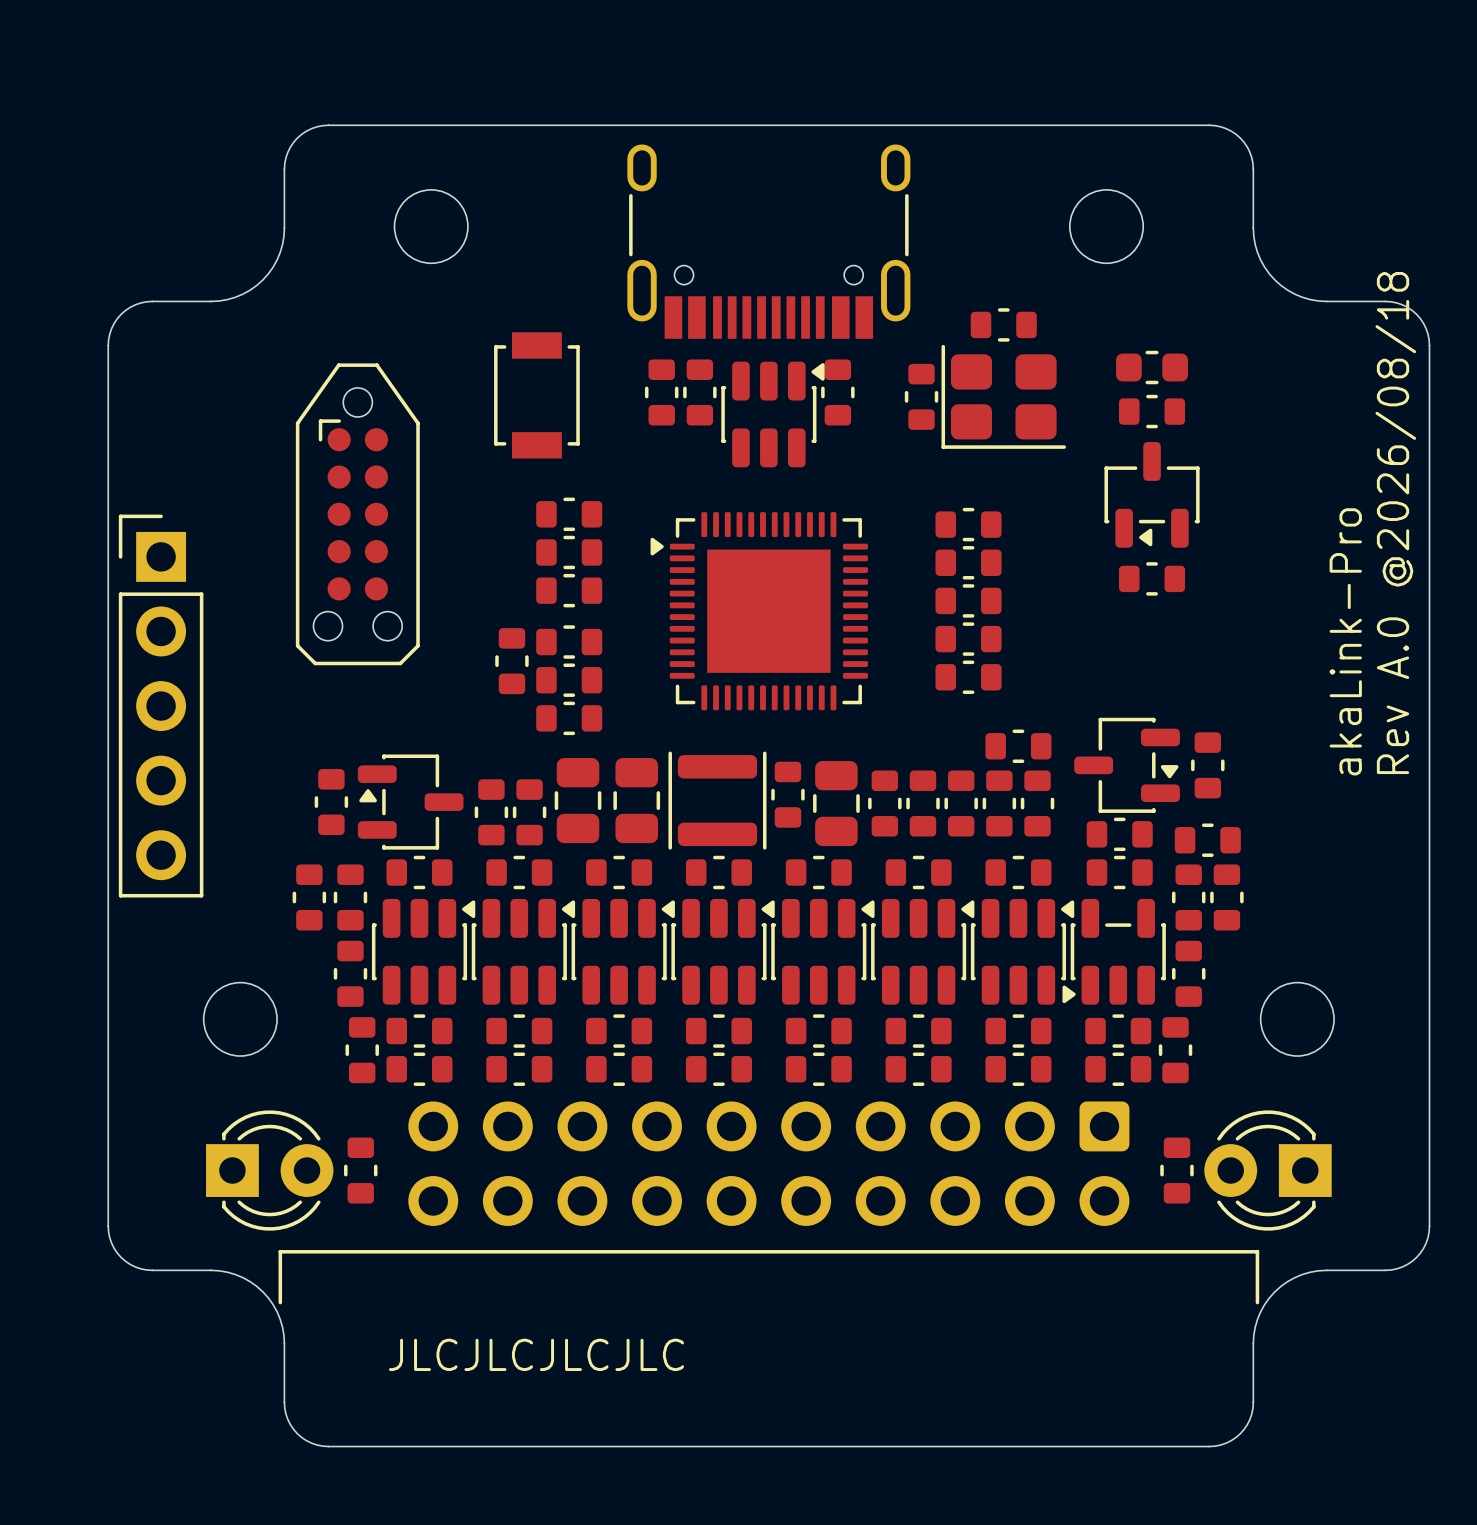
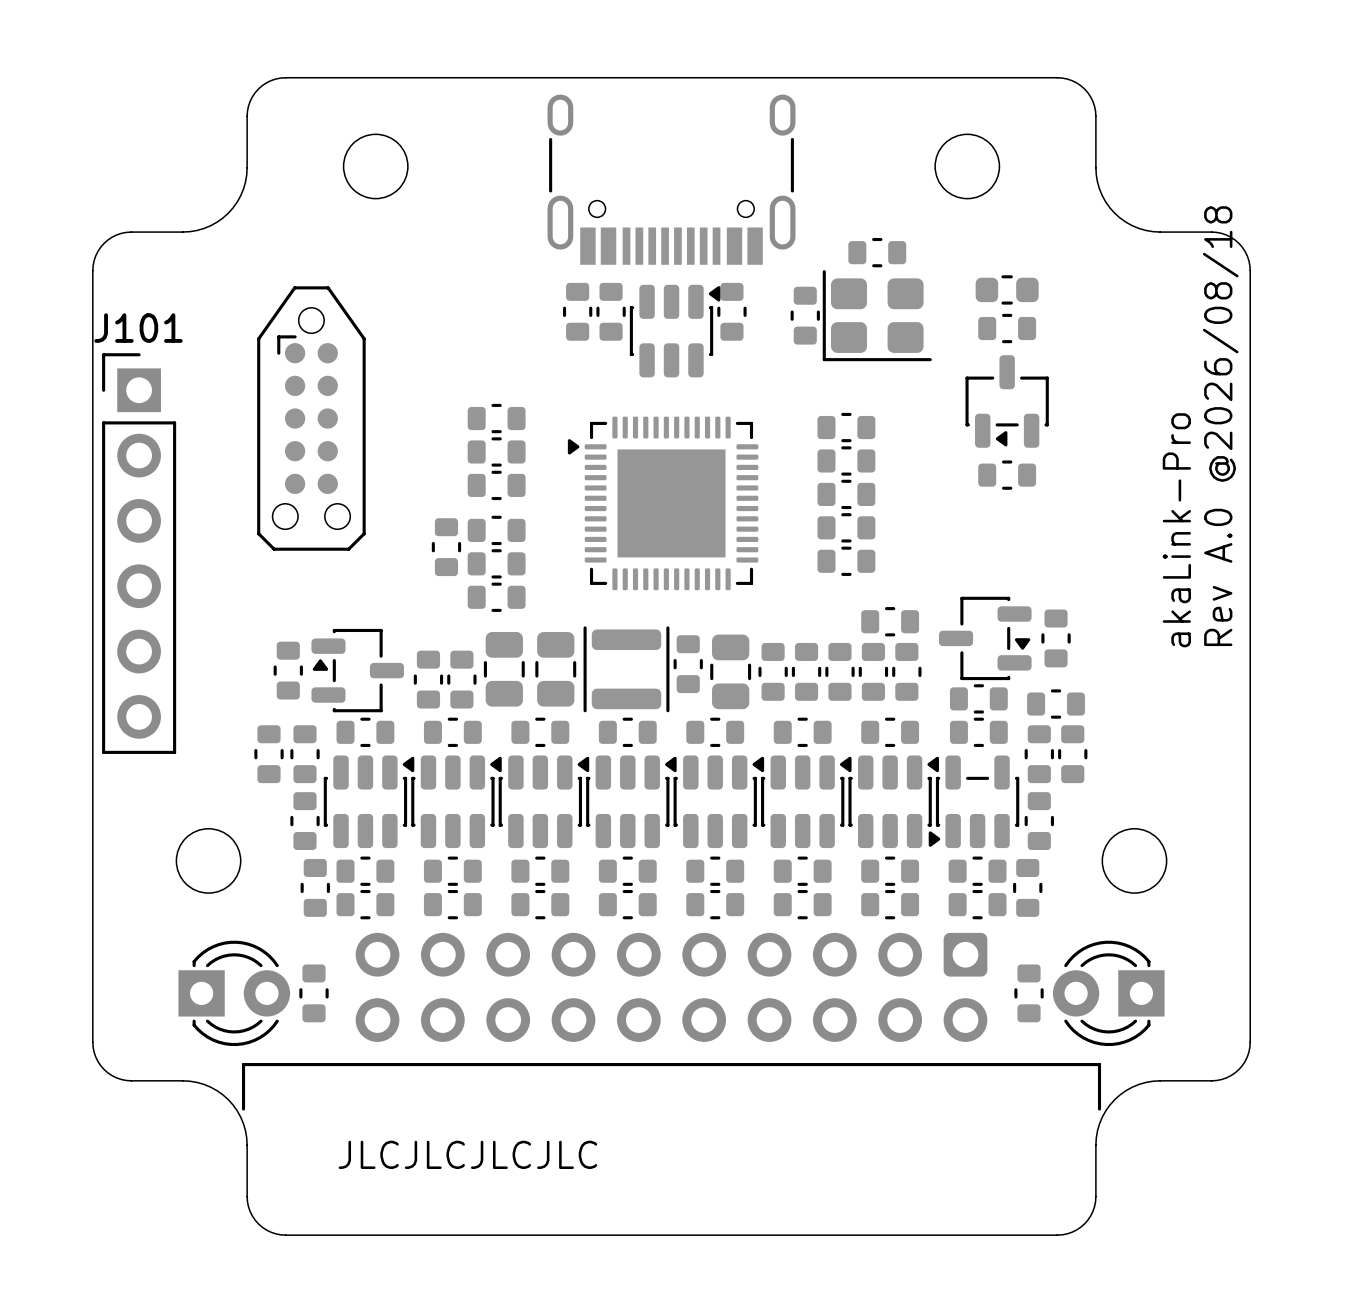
part: (536, 395) -> none
J101: none -> (139, 553)
part: (161, 706) -> none

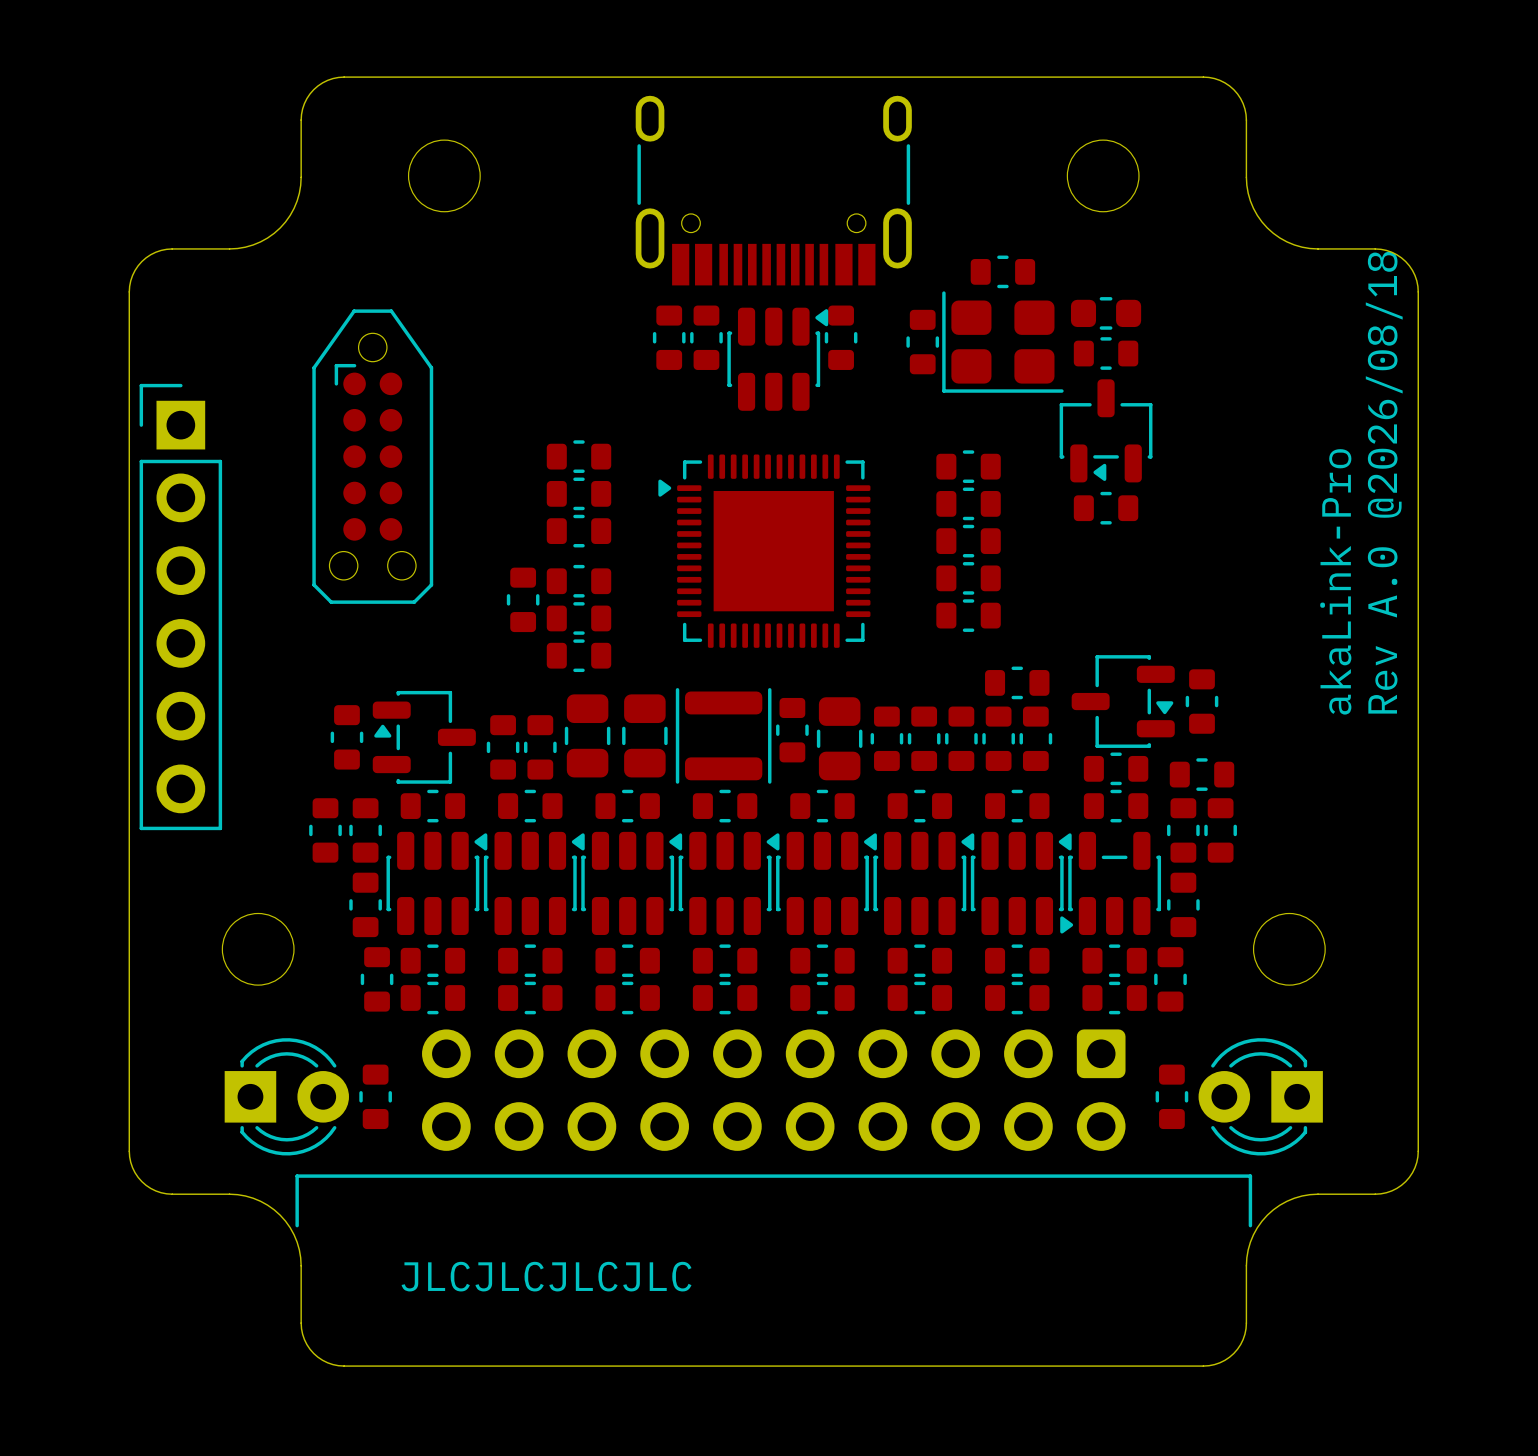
part position: (1007, 289) -> (1106, 313)
J101 name: J101 (138, 328) -> none
part position: (1007, 328) -> (1106, 353)
part position: (1007, 401) -> (1106, 430)
part position: (1007, 475) -> (1106, 508)

